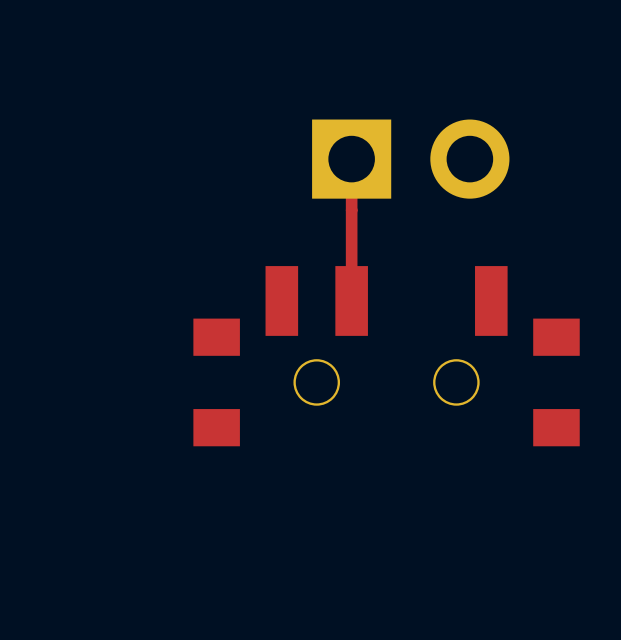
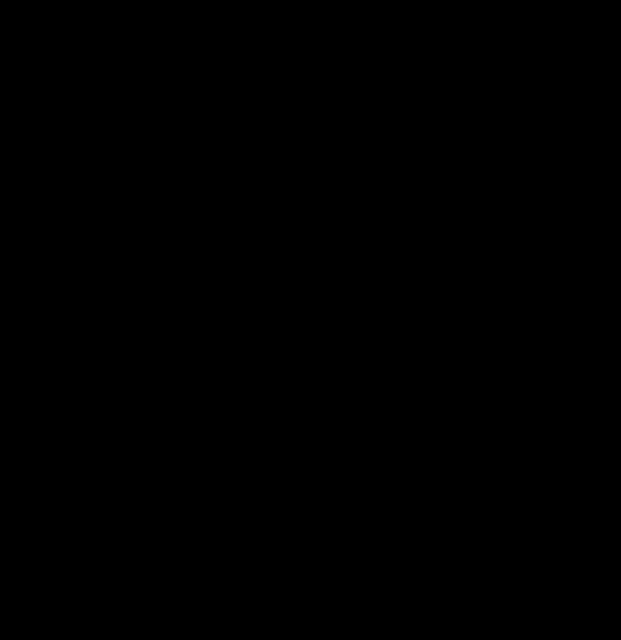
top track: (351, 159) (351, 300) -> none
part: (410, 159) -> none
part: (386, 356) -> none

